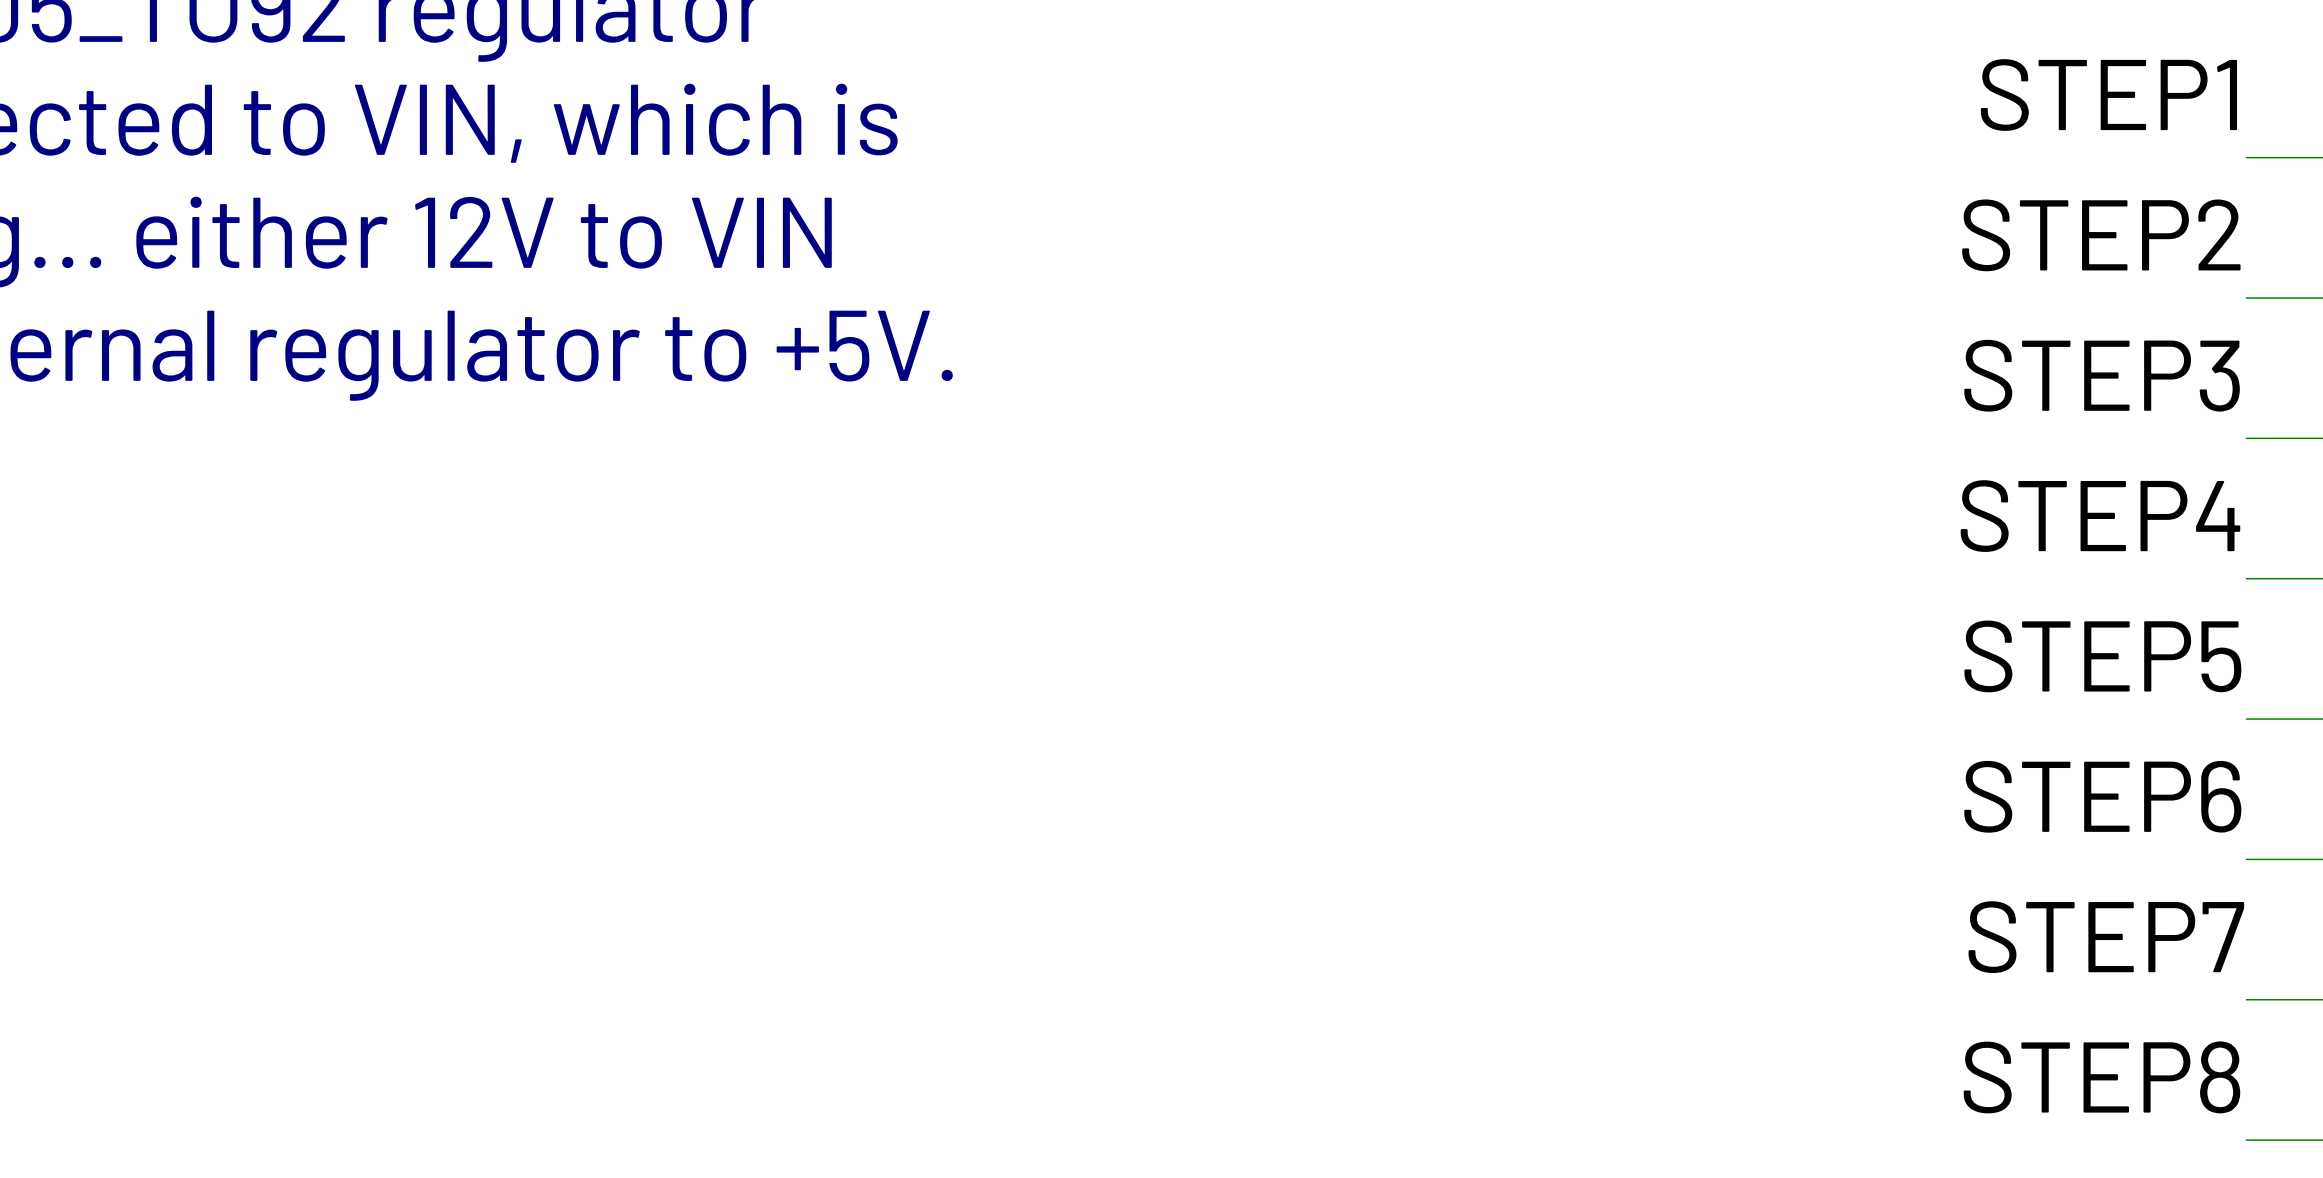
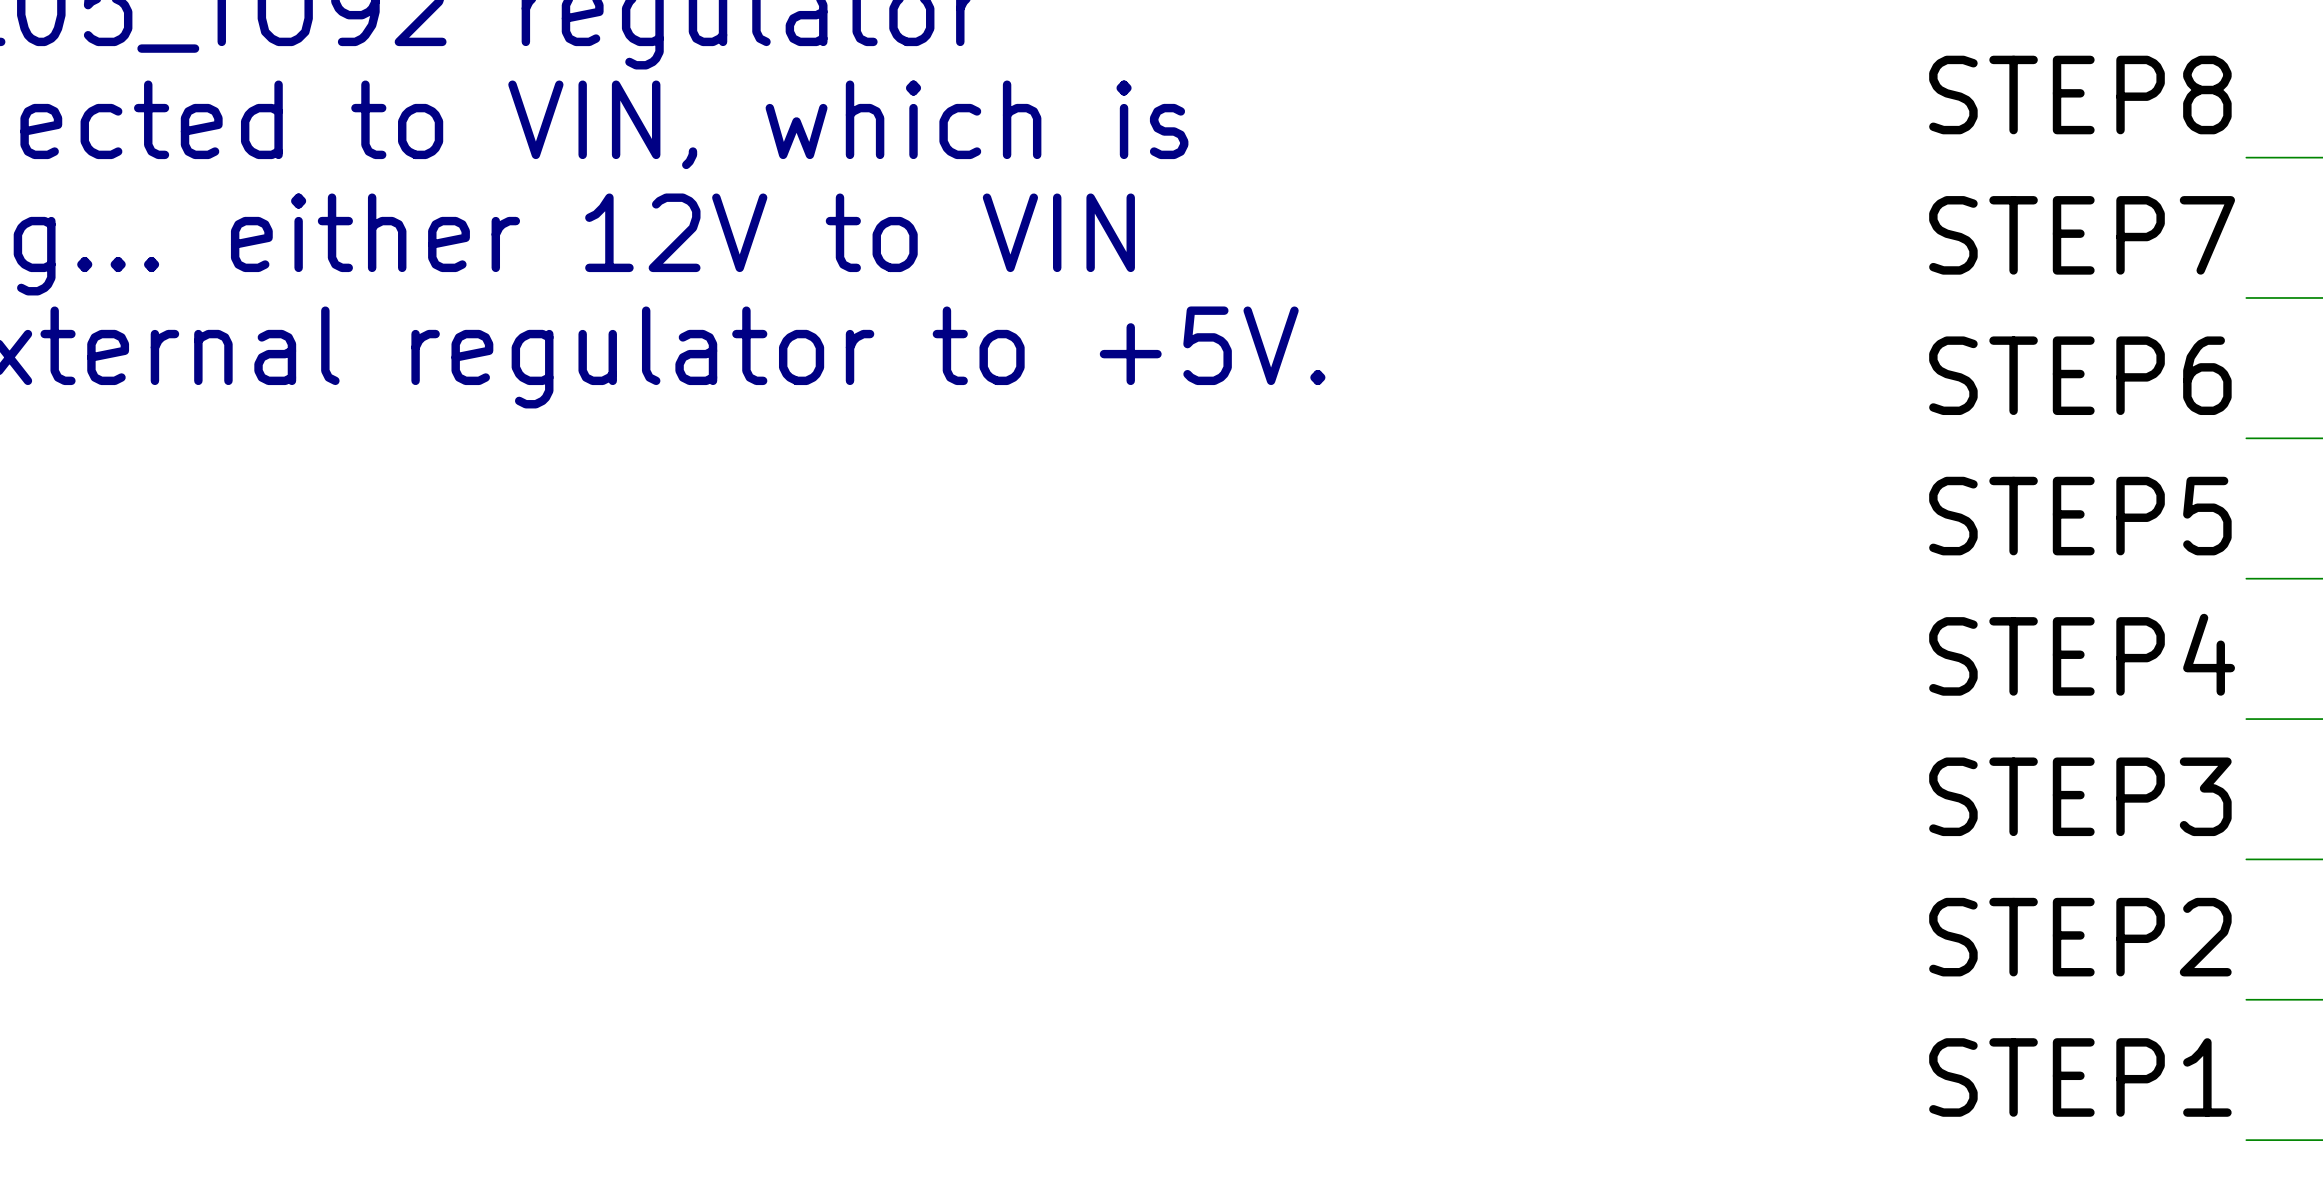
label: STEP1 (2108, 95) -> STEP8 (2080, 95)
label: STEP2 (2101, 235) -> STEP7 (2082, 235)
label: STEP3 (2102, 375) -> STEP6 (2080, 375)
label: STEP4 (2100, 516) -> STEP5 (2080, 516)
label: STEP5 (2102, 656) -> STEP4 (2082, 654)
label: STEP6 (2102, 796) -> STEP3 (2080, 796)
label: STEP7 (2106, 937) -> STEP2 (2080, 937)
label: STEP8 (2101, 1077) -> STEP1 (2080, 1077)

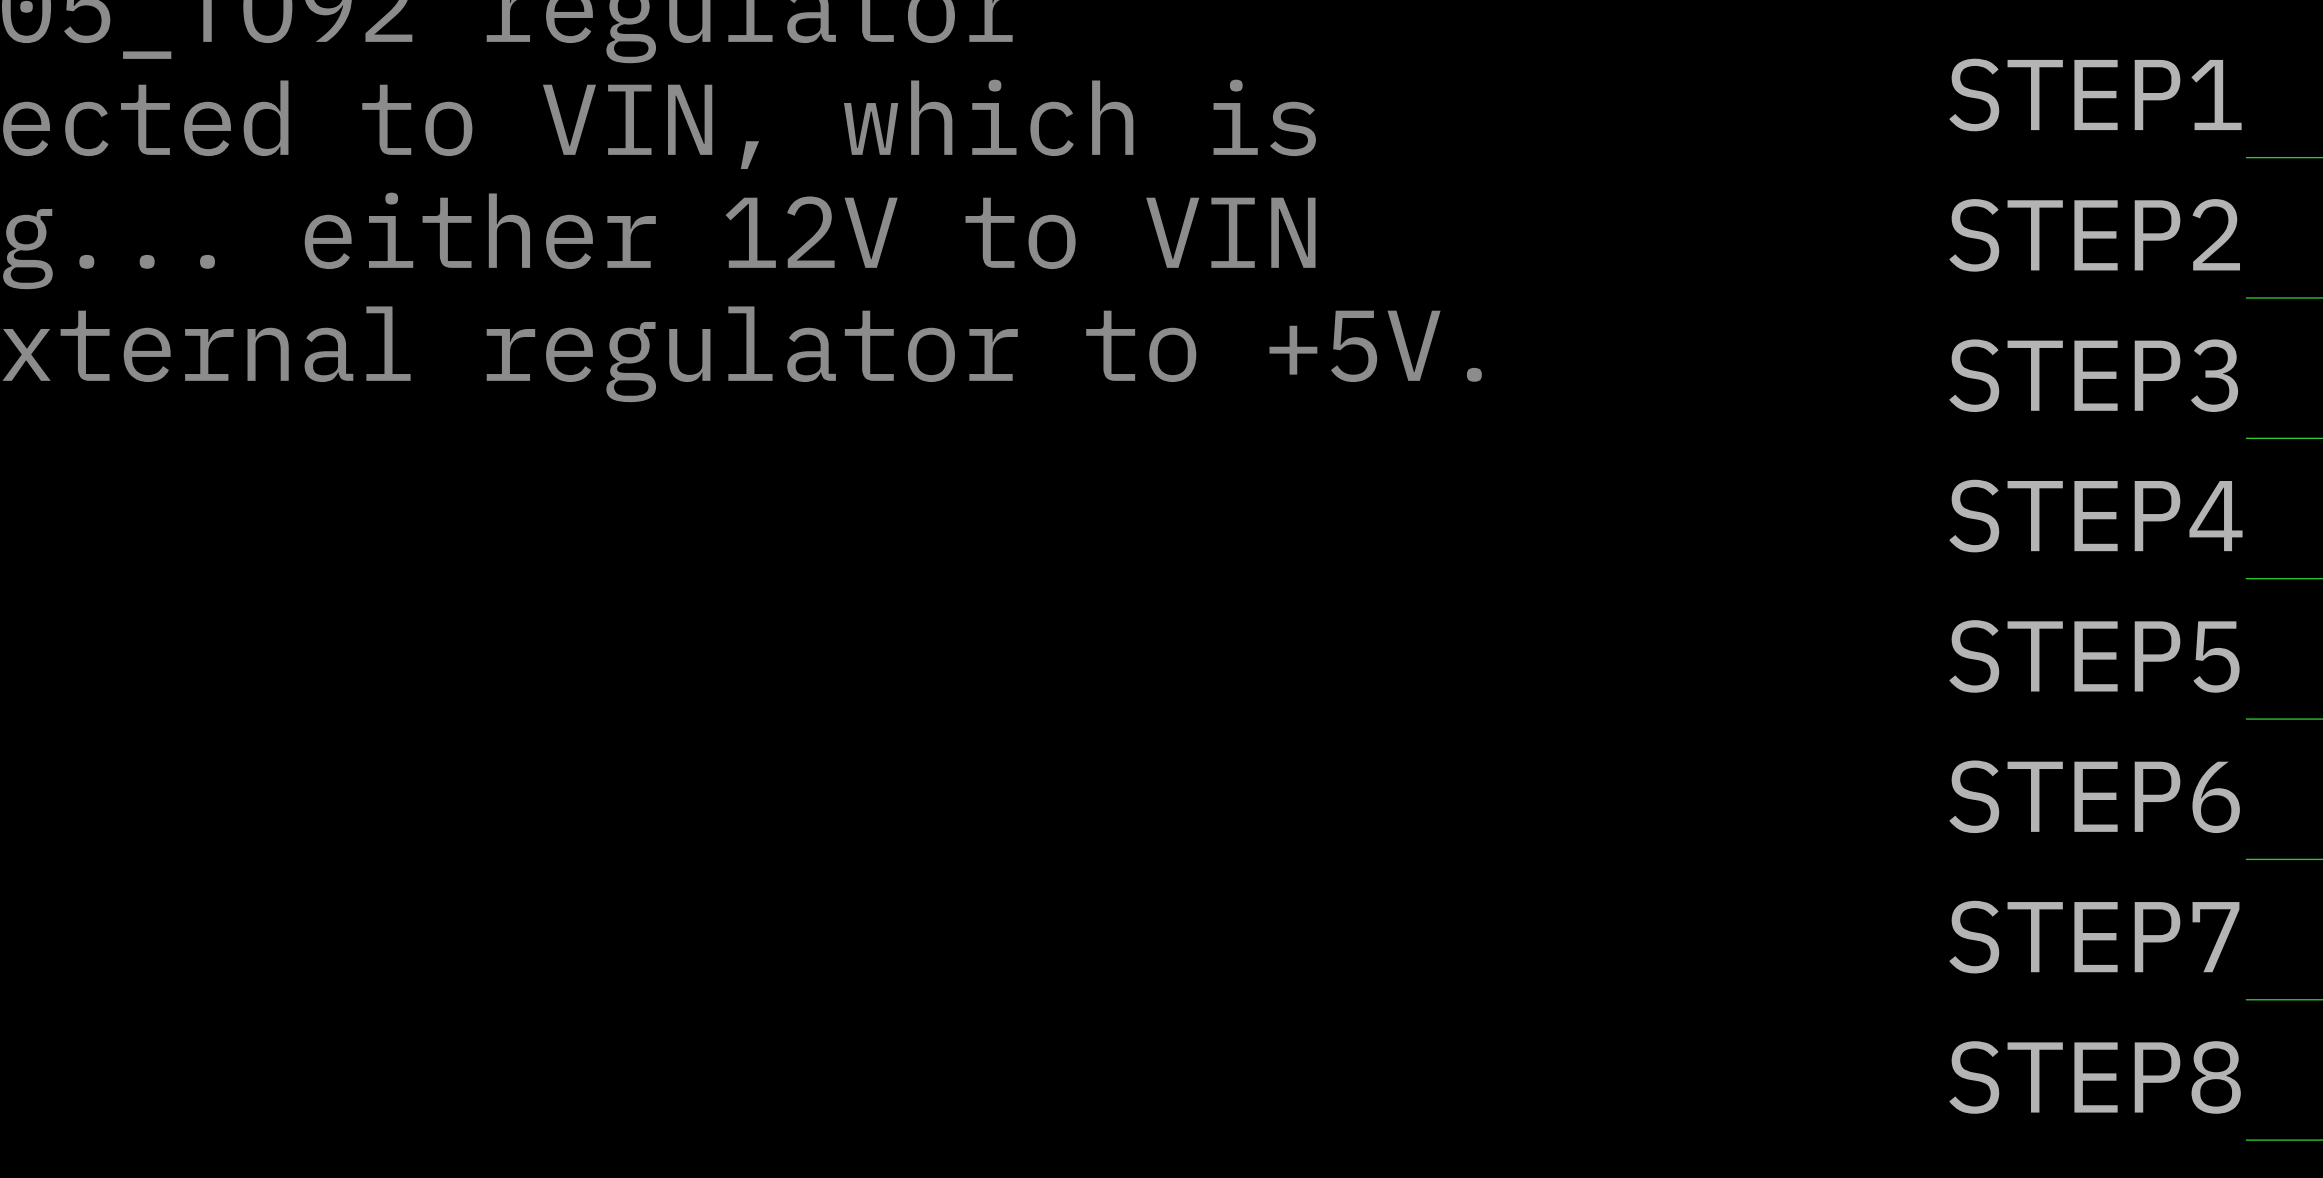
label: STEP8 (2080, 95) -> STEP1 (2095, 95)
label: STEP7 (2082, 235) -> STEP2 (2094, 235)
label: STEP6 (2080, 375) -> STEP3 (2093, 375)
label: STEP5 (2080, 516) -> STEP4 (2095, 516)
label: STEP4 (2082, 654) -> STEP5 (2094, 656)
label: STEP3 (2080, 796) -> STEP6 (2094, 796)
label: STEP2 (2080, 937) -> STEP7 (2094, 937)
label: STEP1 (2080, 1077) -> STEP8 (2095, 1077)

